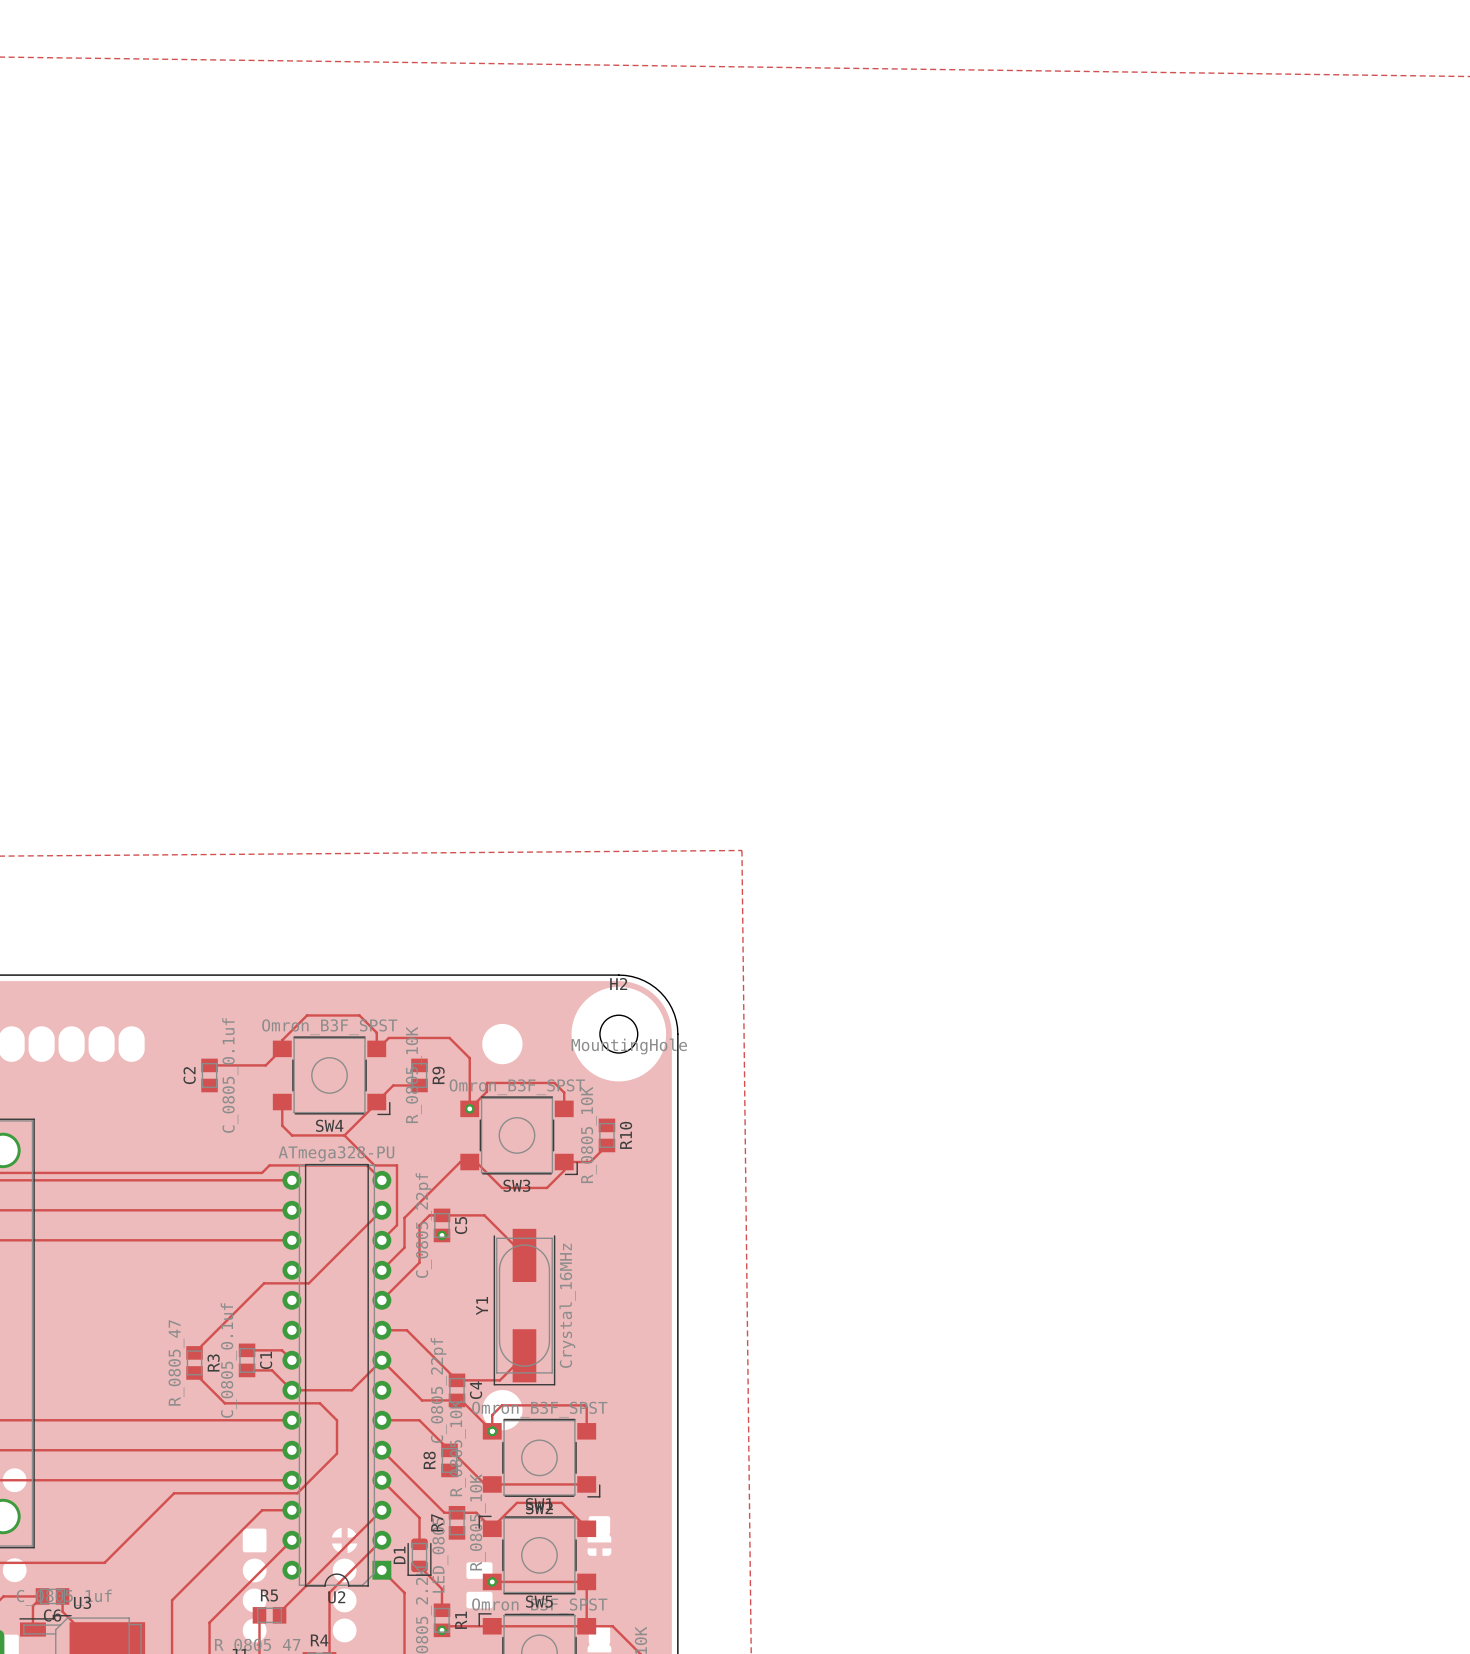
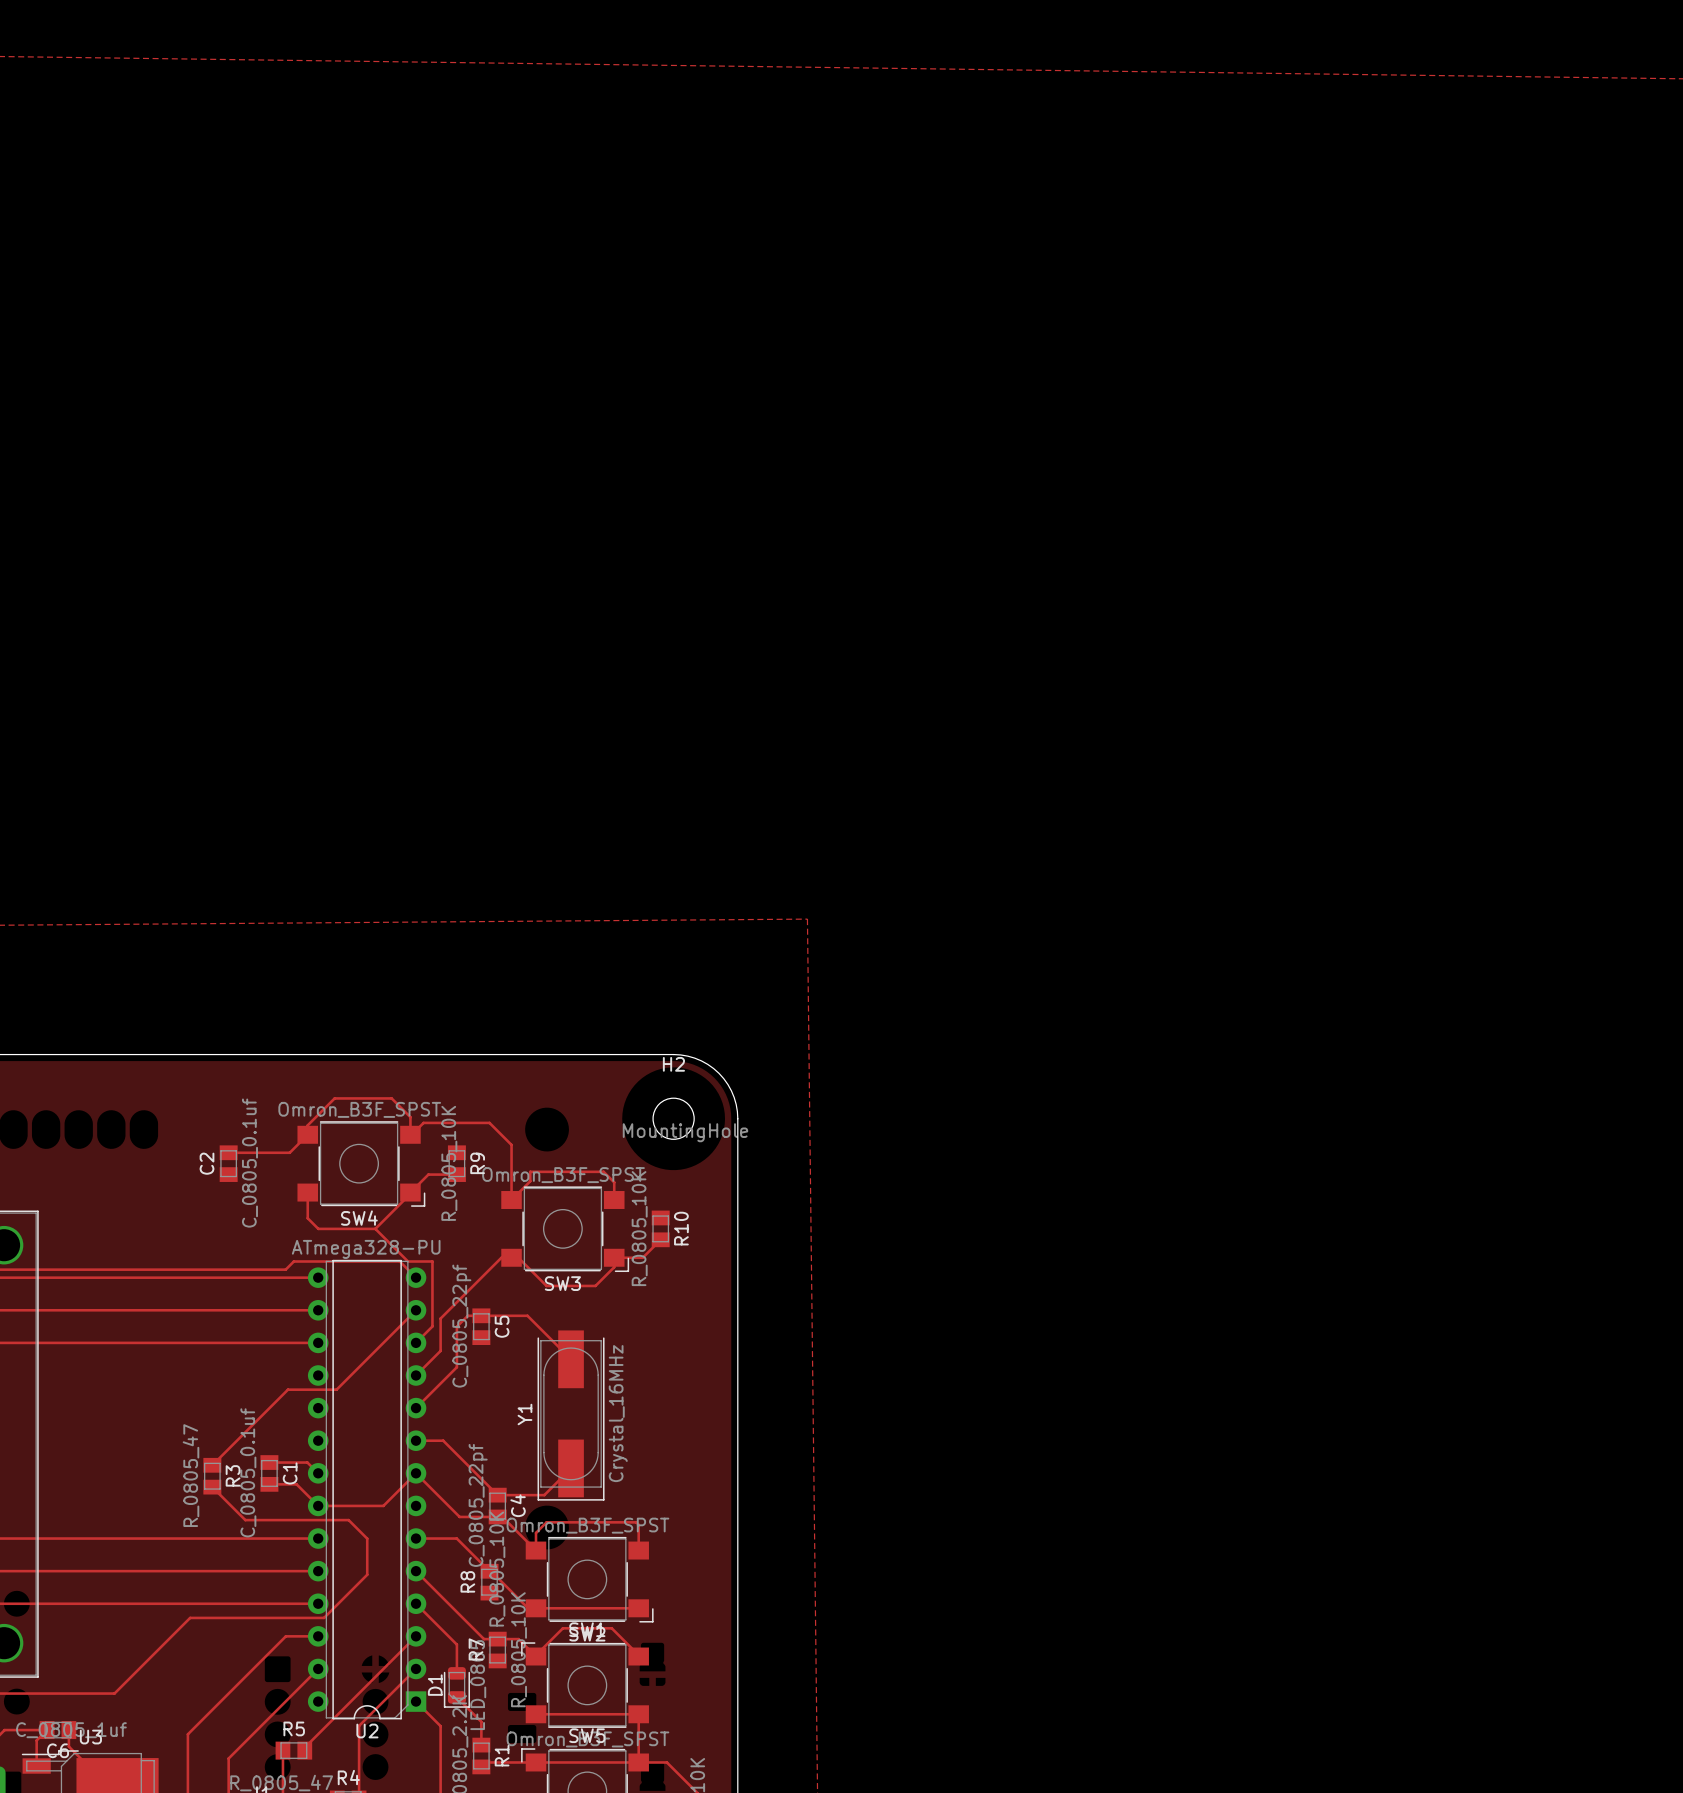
via: (469, 1108) -> none
via: (441, 1235) -> none
via: (492, 1431) -> none
via: (492, 1581) -> none
via: (441, 1630) -> none

